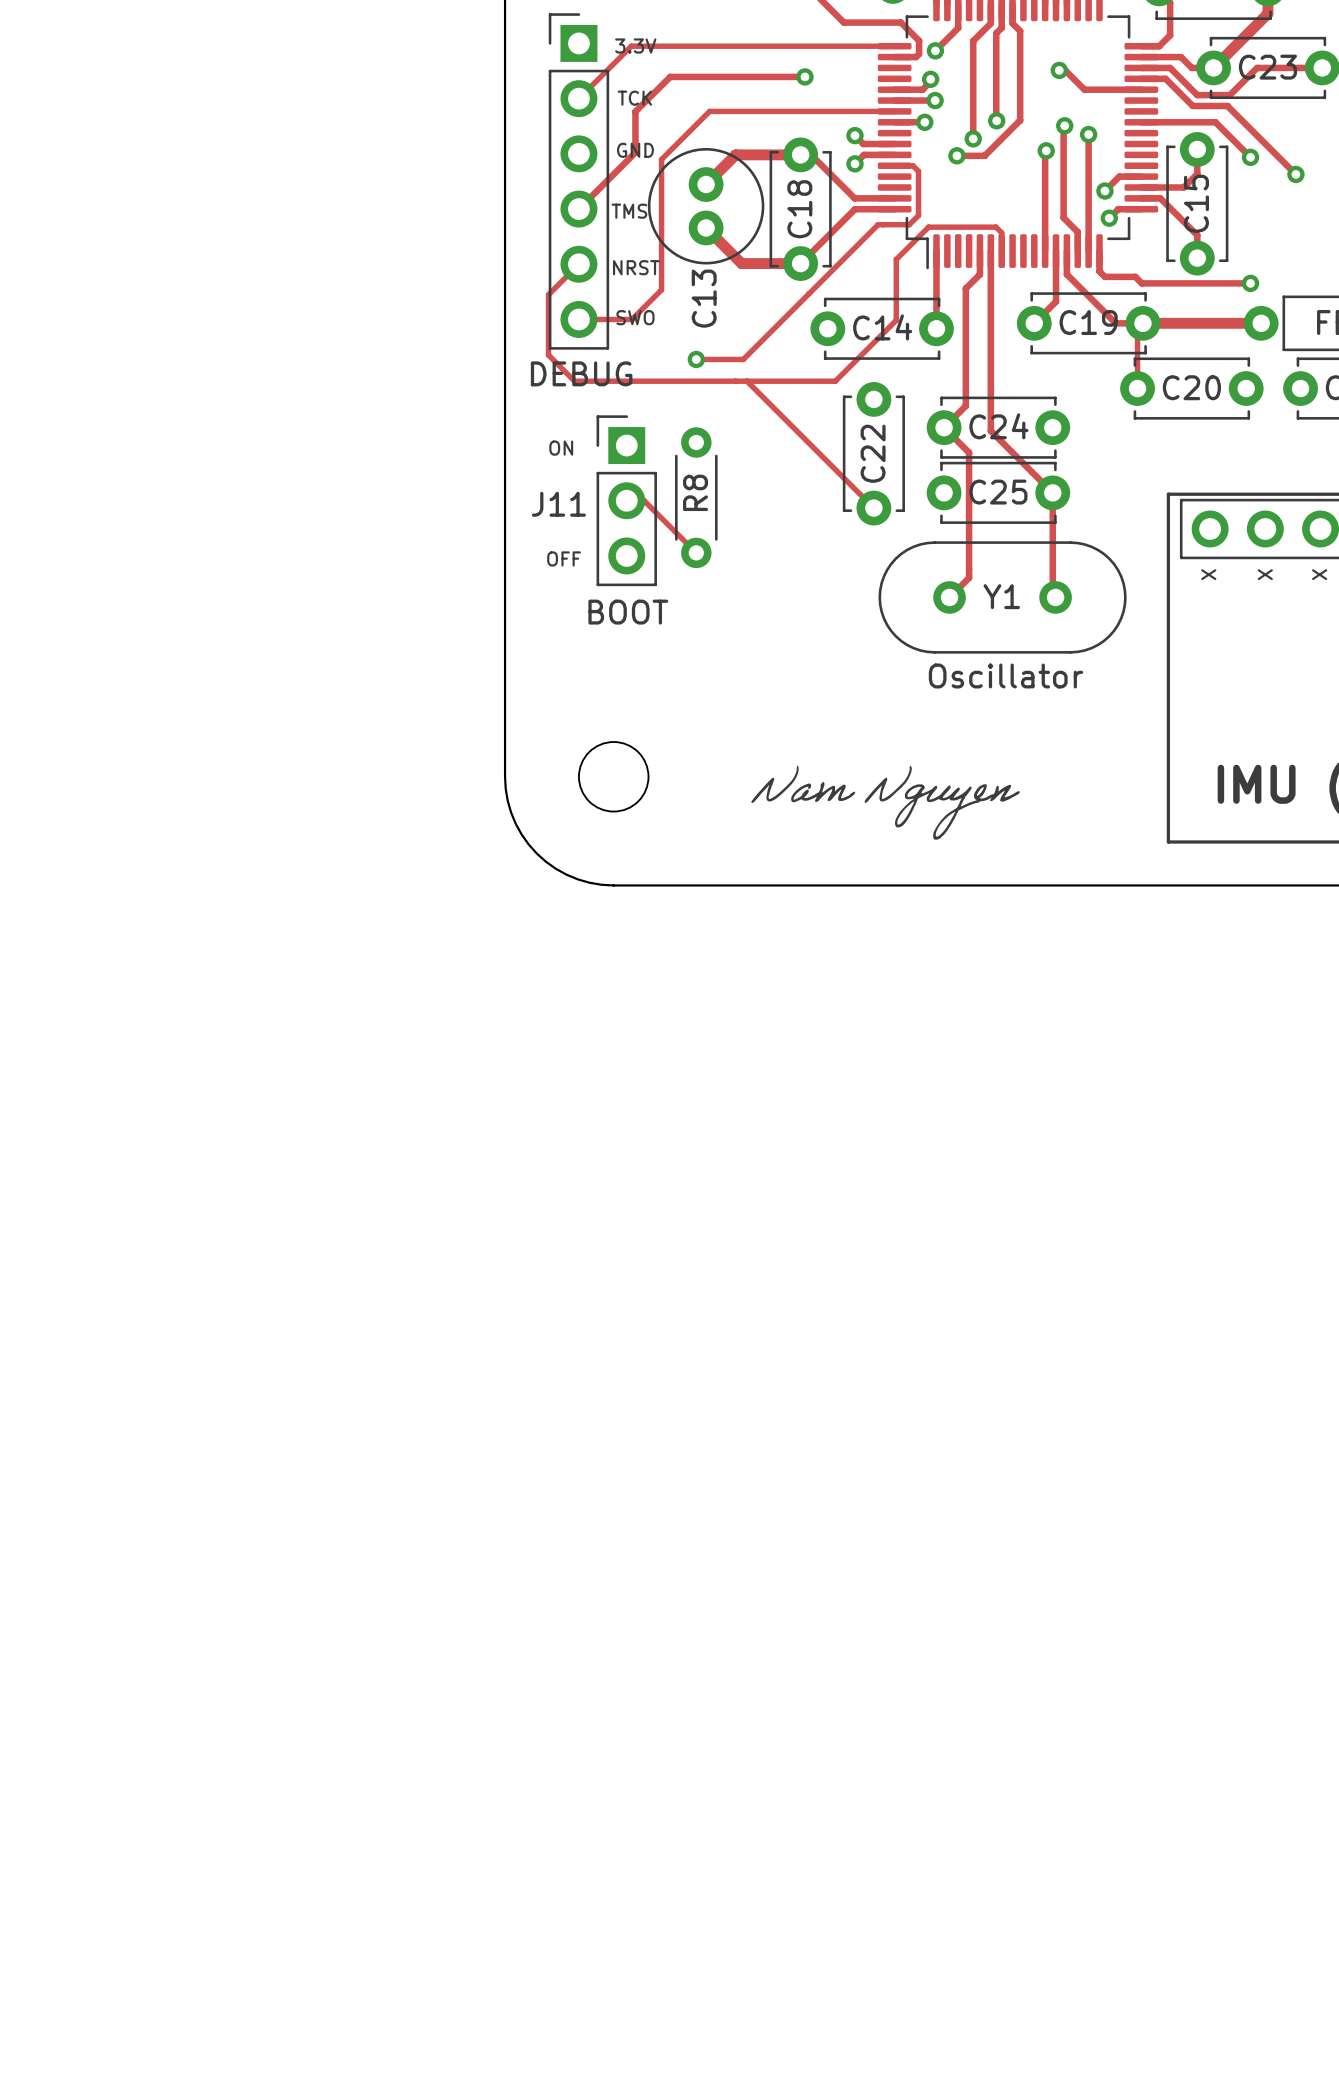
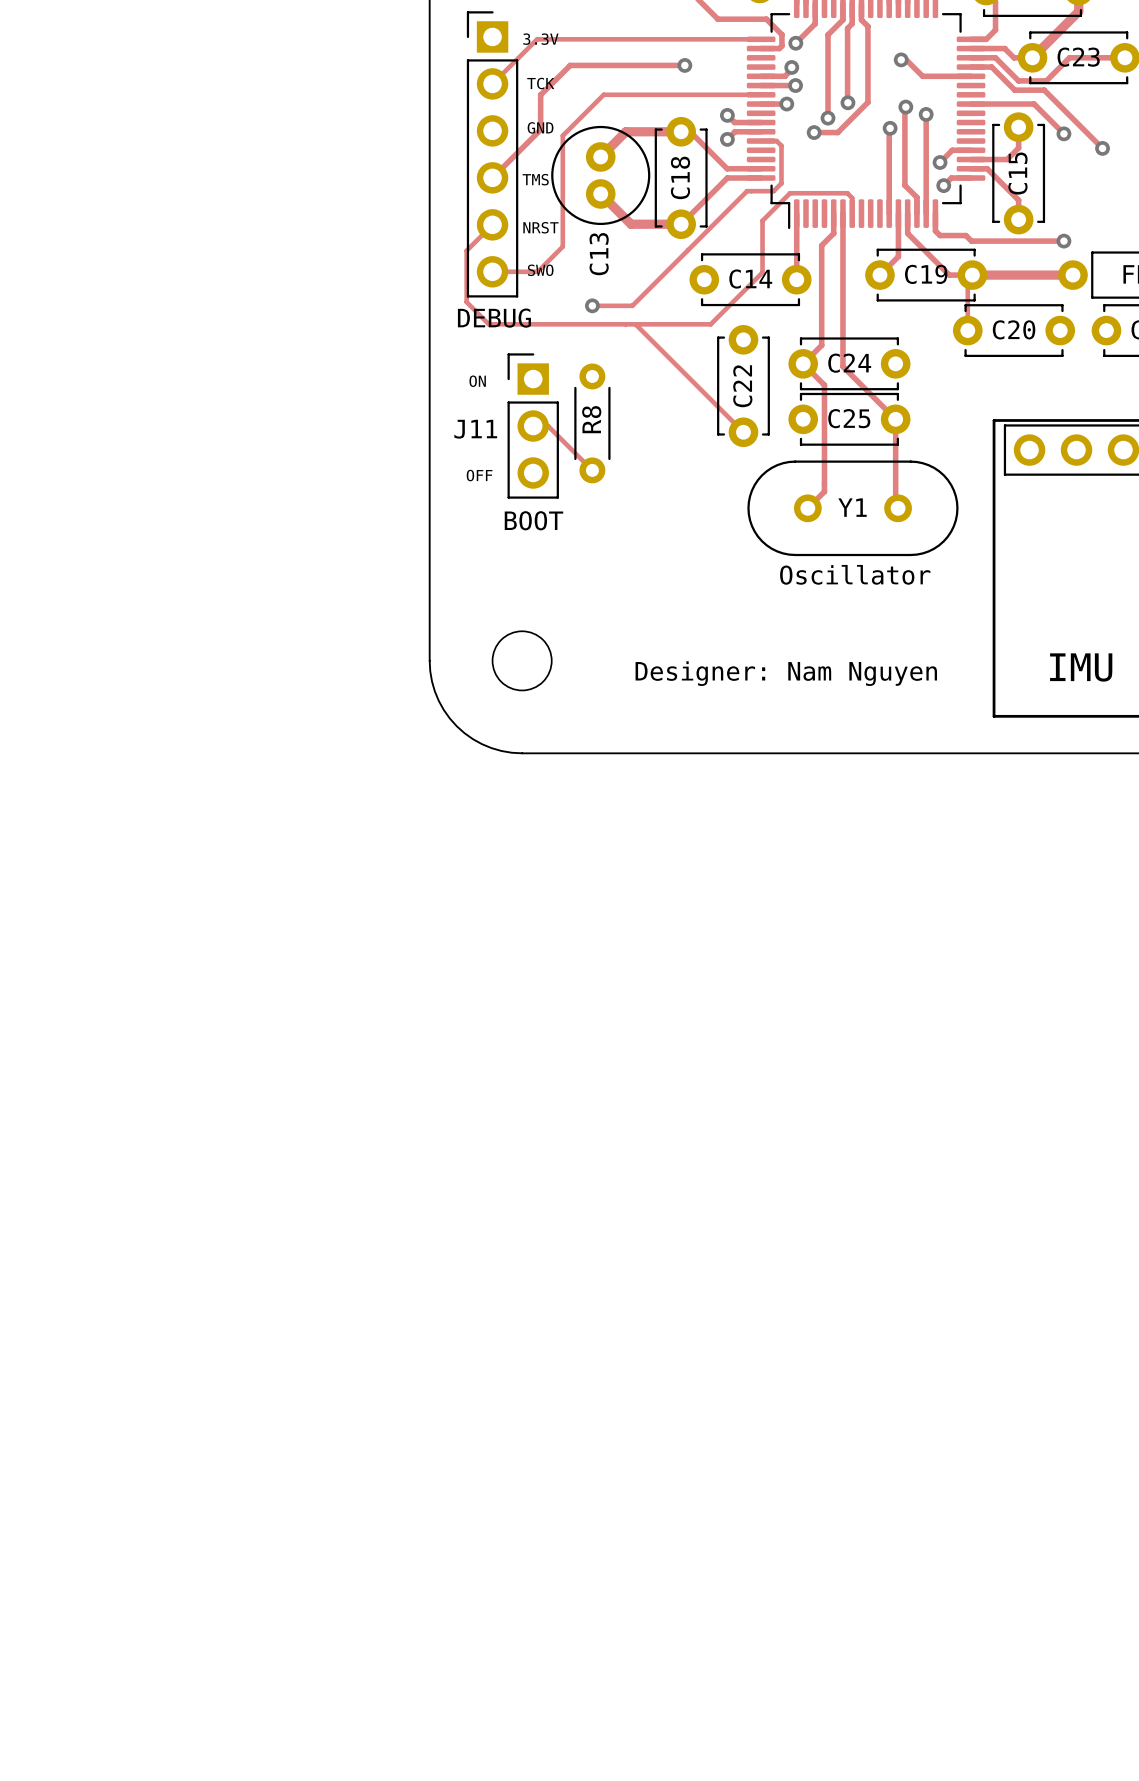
text: X (1208, 574) -> none
text: X (1265, 574) -> none
text: X (1319, 574) -> none
drawing: [751, 765, 1020, 840] -> none
text: none -> Designer: Nam Nguyen (786, 673)

